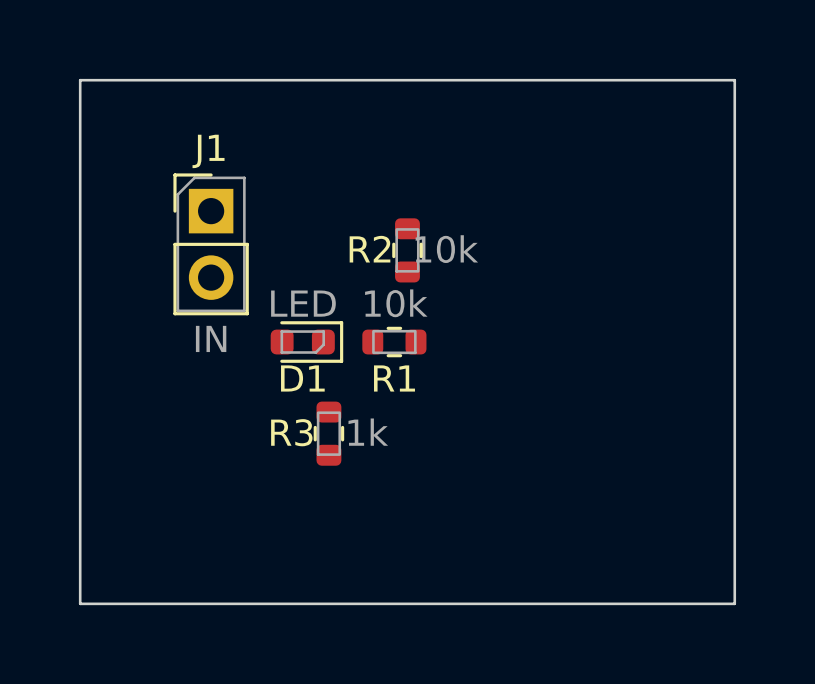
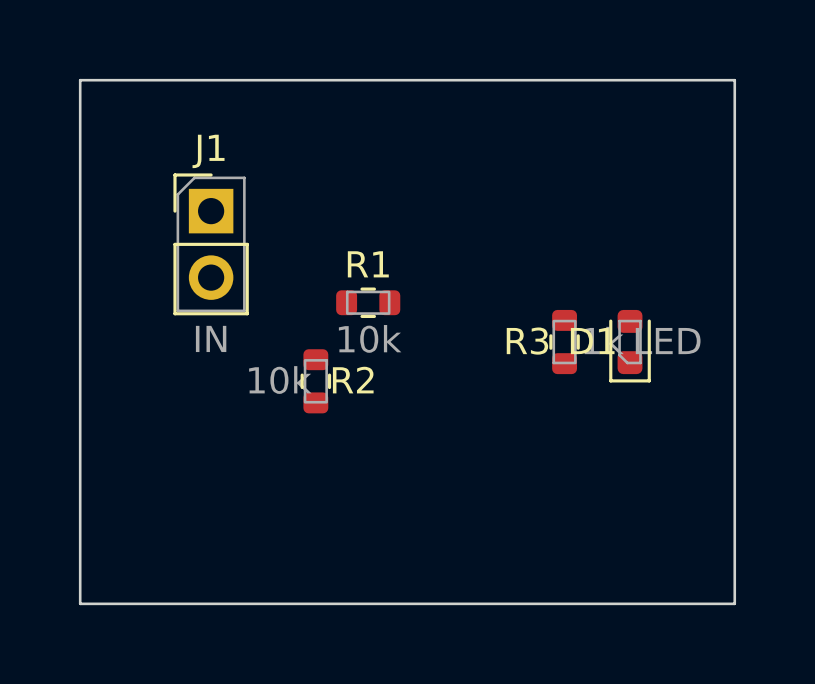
R2 name position: R2 (370, 249) -> R2 (353, 380)
R2 value position: 10k (446, 249) -> 10k (280, 380)
R2 position: (407, 250) -> (315, 381)
R1 value position: 10k (396, 303) -> 10k (370, 338)
D1 rotation: 0° (306, 342) -> 90° clockwise (630, 346)
D1 position: (306, 342) -> (630, 346)
R1 position: (394, 342) -> (368, 302)
R1 name position: R1 (394, 378) -> R1 (368, 264)
R3 position: (328, 433) -> (564, 342)

